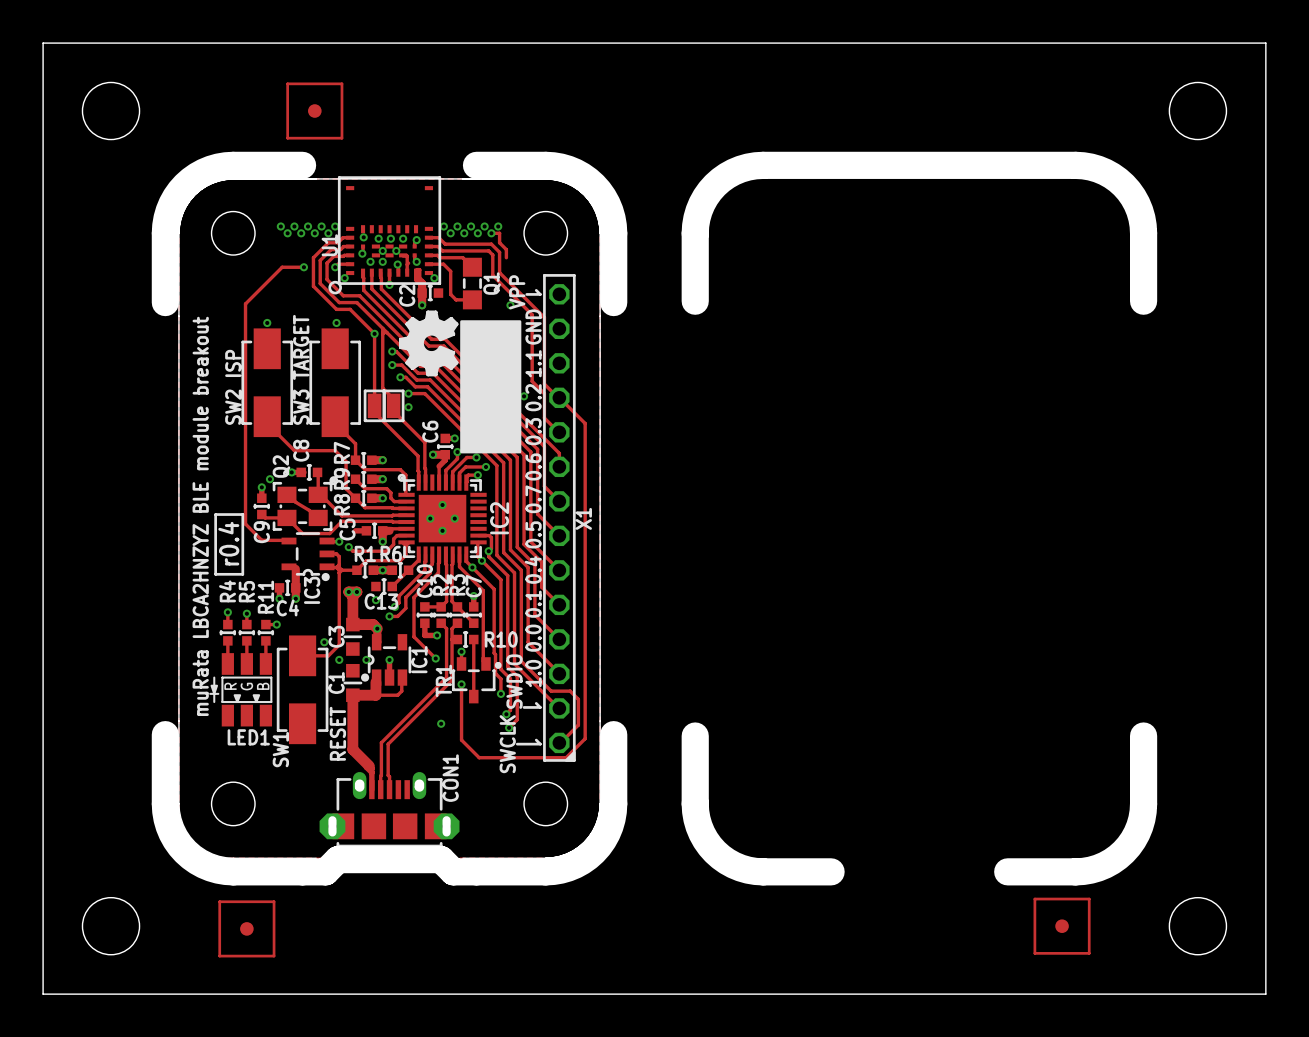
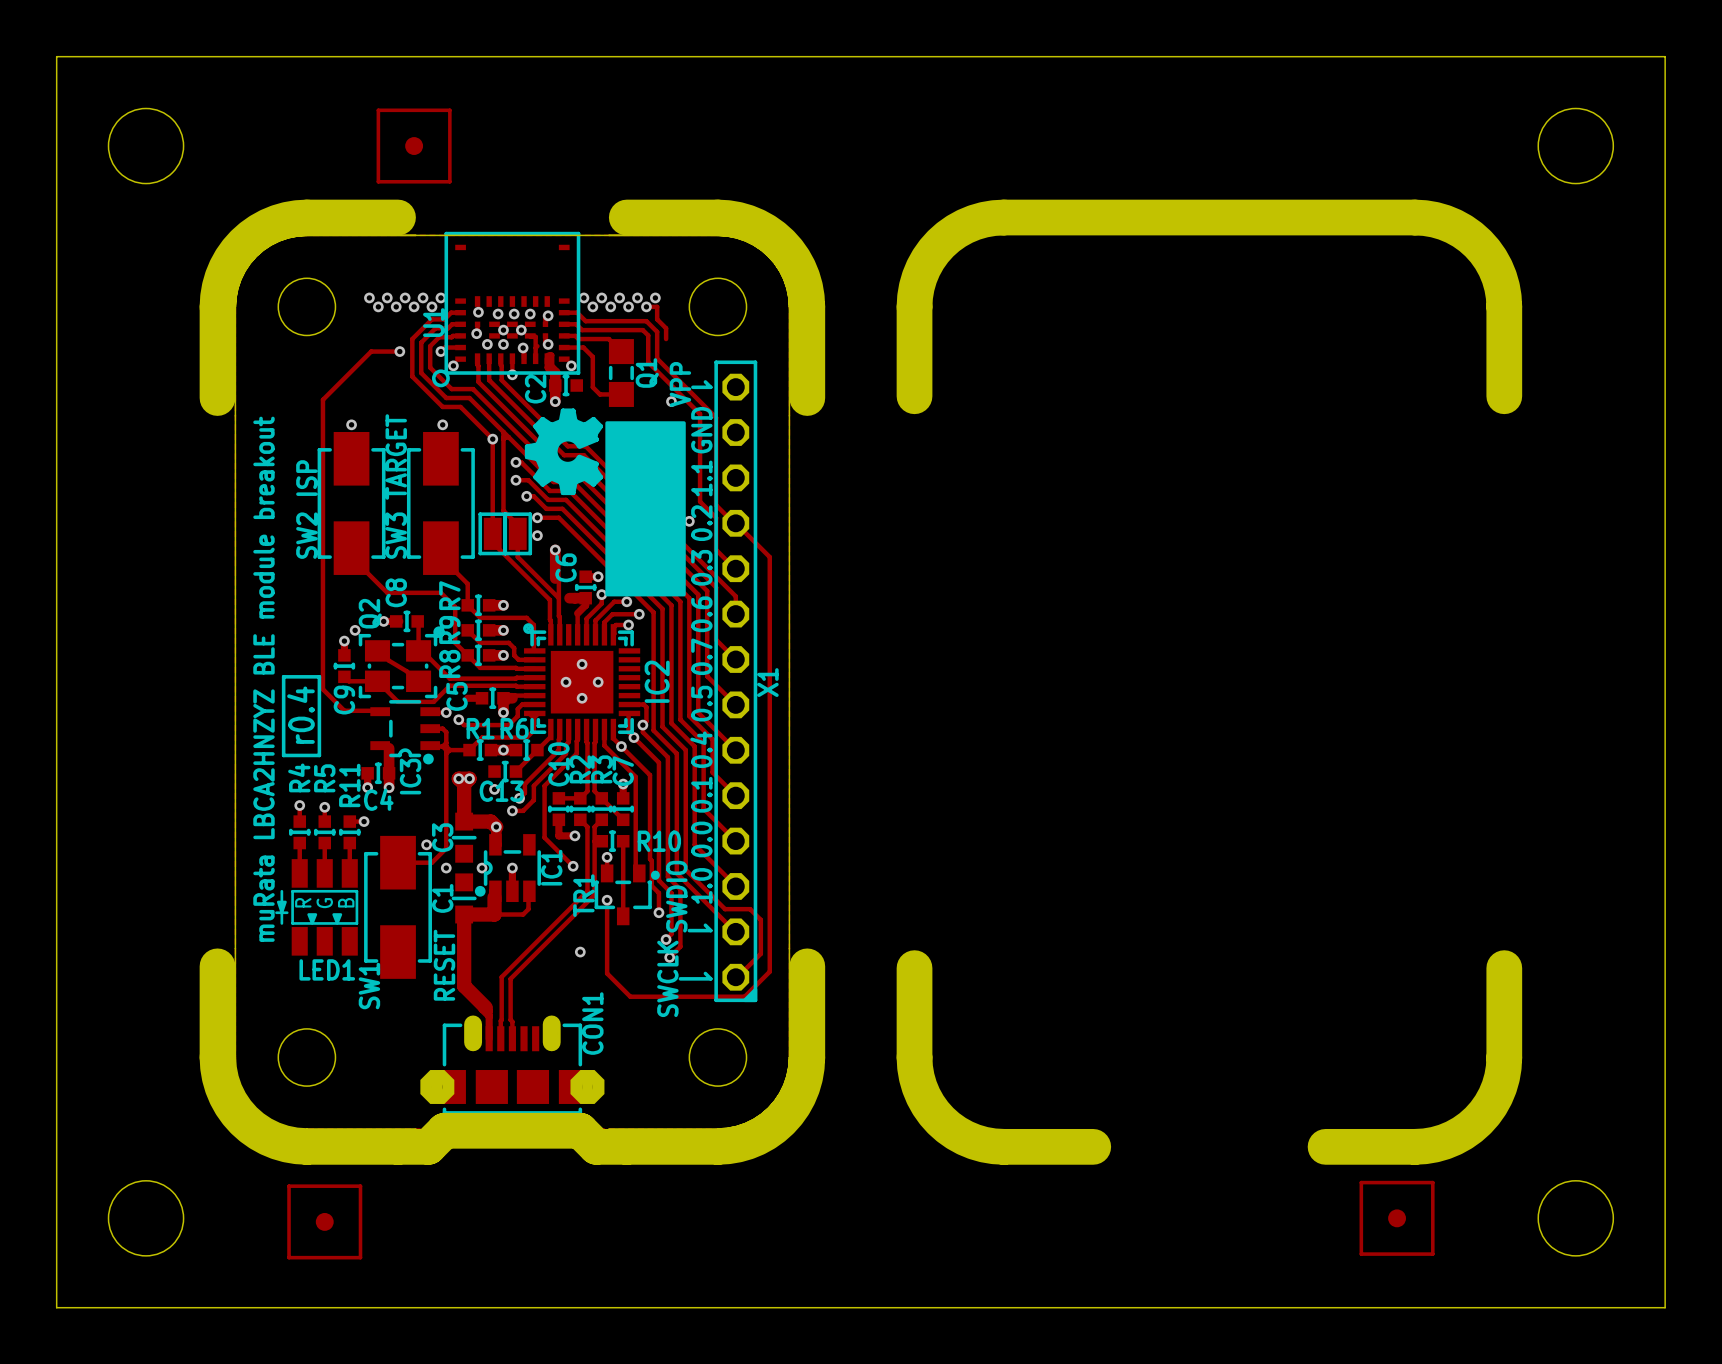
track: (393, 411) (422, 439) -> (517, 541) (517, 557) (558, 598)
track: none -> (555, 549) (555, 578)
via position: (433, 454) -> (555, 549)

